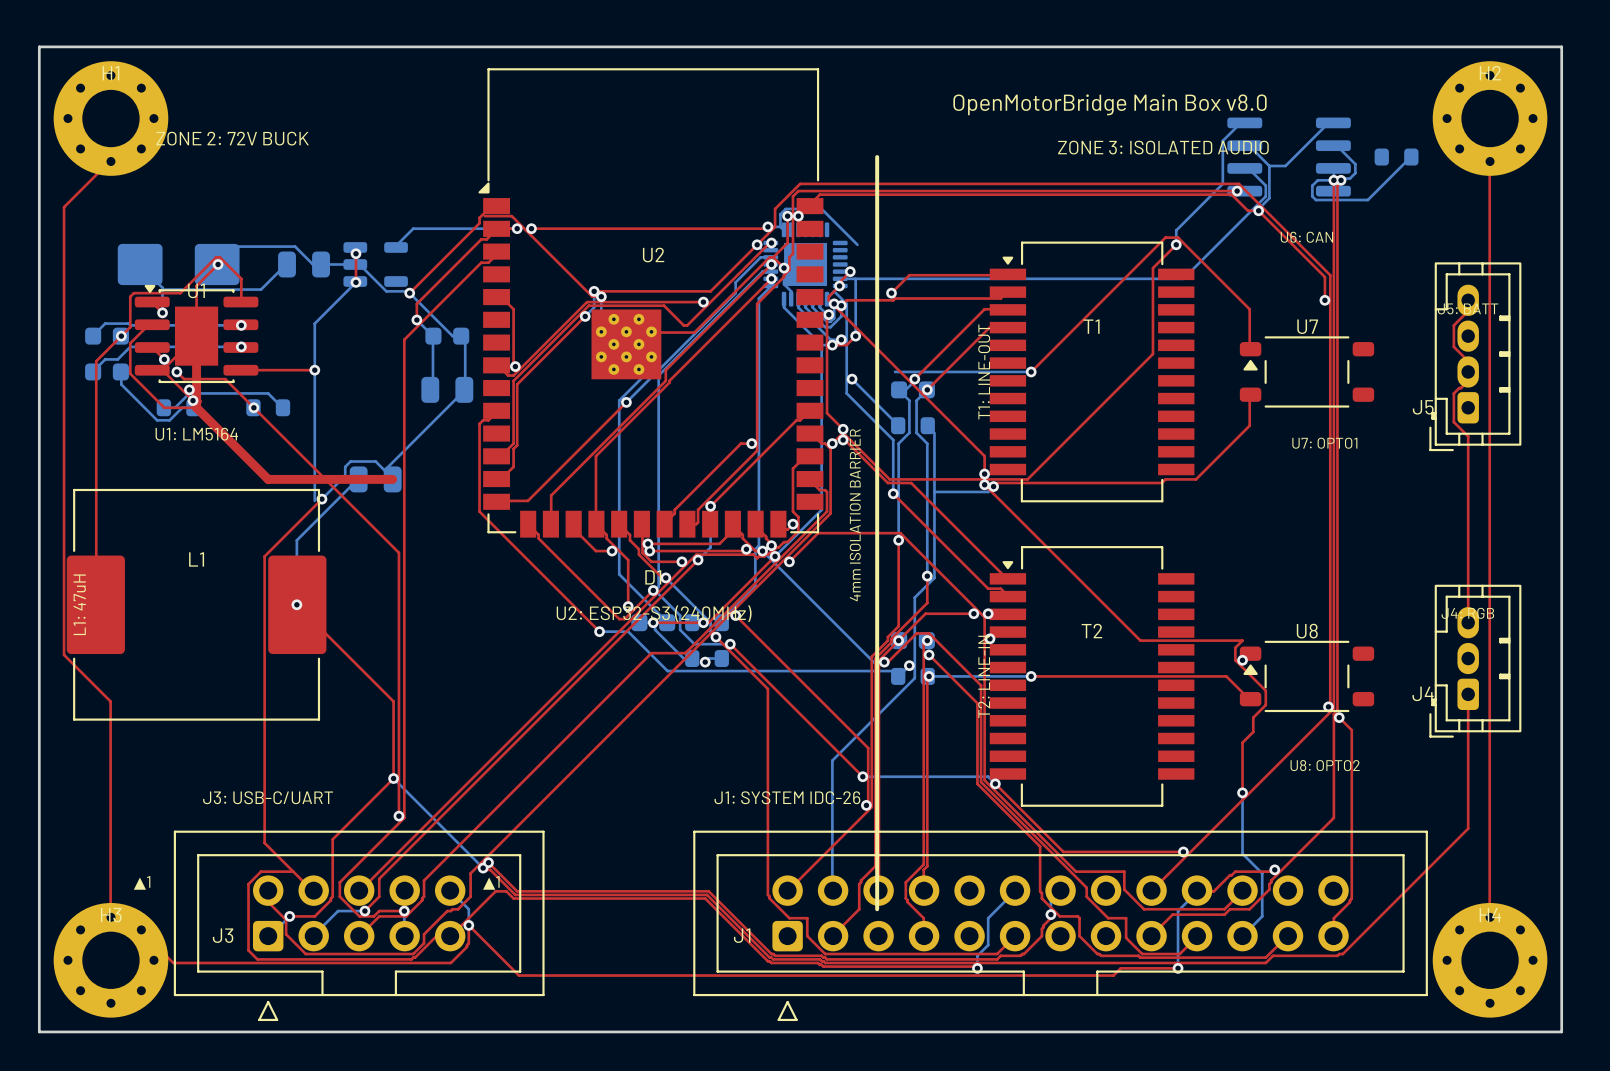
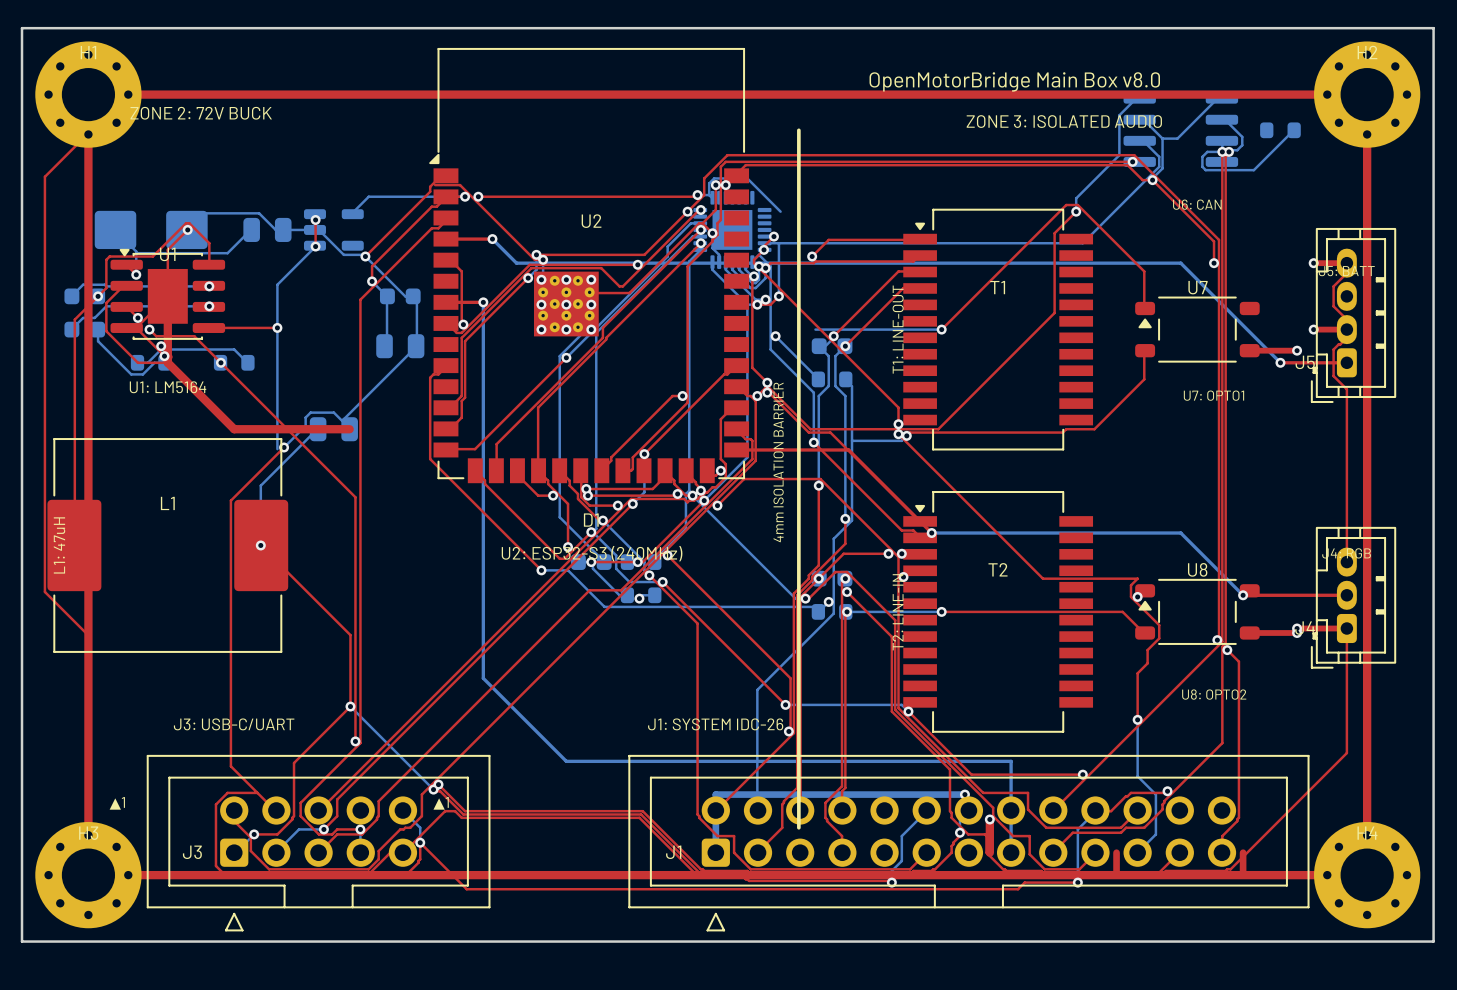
top track: none -> (88, 94) (88, 875) (1367, 875) (1367, 94) (88, 94)
top track: none -> (445, 239) (492, 239)
bottom track: none -> (492, 239) (516, 263) (1180, 263) (1280, 362)
via: none -> (492, 239)
top track: none -> (1313, 263) (1346, 263)
via: none -> (1313, 263)
via: none -> (541, 279)
via: none -> (566, 279)
via: none -> (591, 279)
top track: none -> (445, 302) (483, 302)
bottom track: none -> (483, 302) (483, 678) (566, 761) (1011, 761) (1011, 852)
via: none -> (483, 302)
via: none -> (541, 304)
via: none -> (566, 304)
via: none -> (591, 304)
via: none -> (541, 329)
via: none -> (566, 329)
via: none -> (591, 329)
top track: none -> (1313, 329) (1346, 329)
via: none -> (1313, 329)
top track: none -> (1249, 350) (1297, 350)
via: none -> (1297, 350)
top track: none -> (1280, 362) (1346, 362)
via: none -> (1280, 362)
top track: none -> (736, 449) (848, 449) (931, 533)
bottom track: none -> (931, 533) (1180, 533) (1243, 595)
via: none -> (931, 533)
top track: none -> (1243, 595) (1346, 595)
via: none -> (1243, 595)
top track: none -> (1297, 628) (1346, 628)
via: none -> (1297, 628)
top track: none -> (1249, 632) (1297, 632)
via: none -> (1297, 632)
bottom track: none -> (964, 794) (715, 794) (715, 852)
via: none -> (964, 794)
top track: none -> (989, 819) (989, 852)
via: none -> (989, 819)
top track: none -> (1116, 852) (1116, 875)
top track: none -> (1243, 852) (1243, 875)

